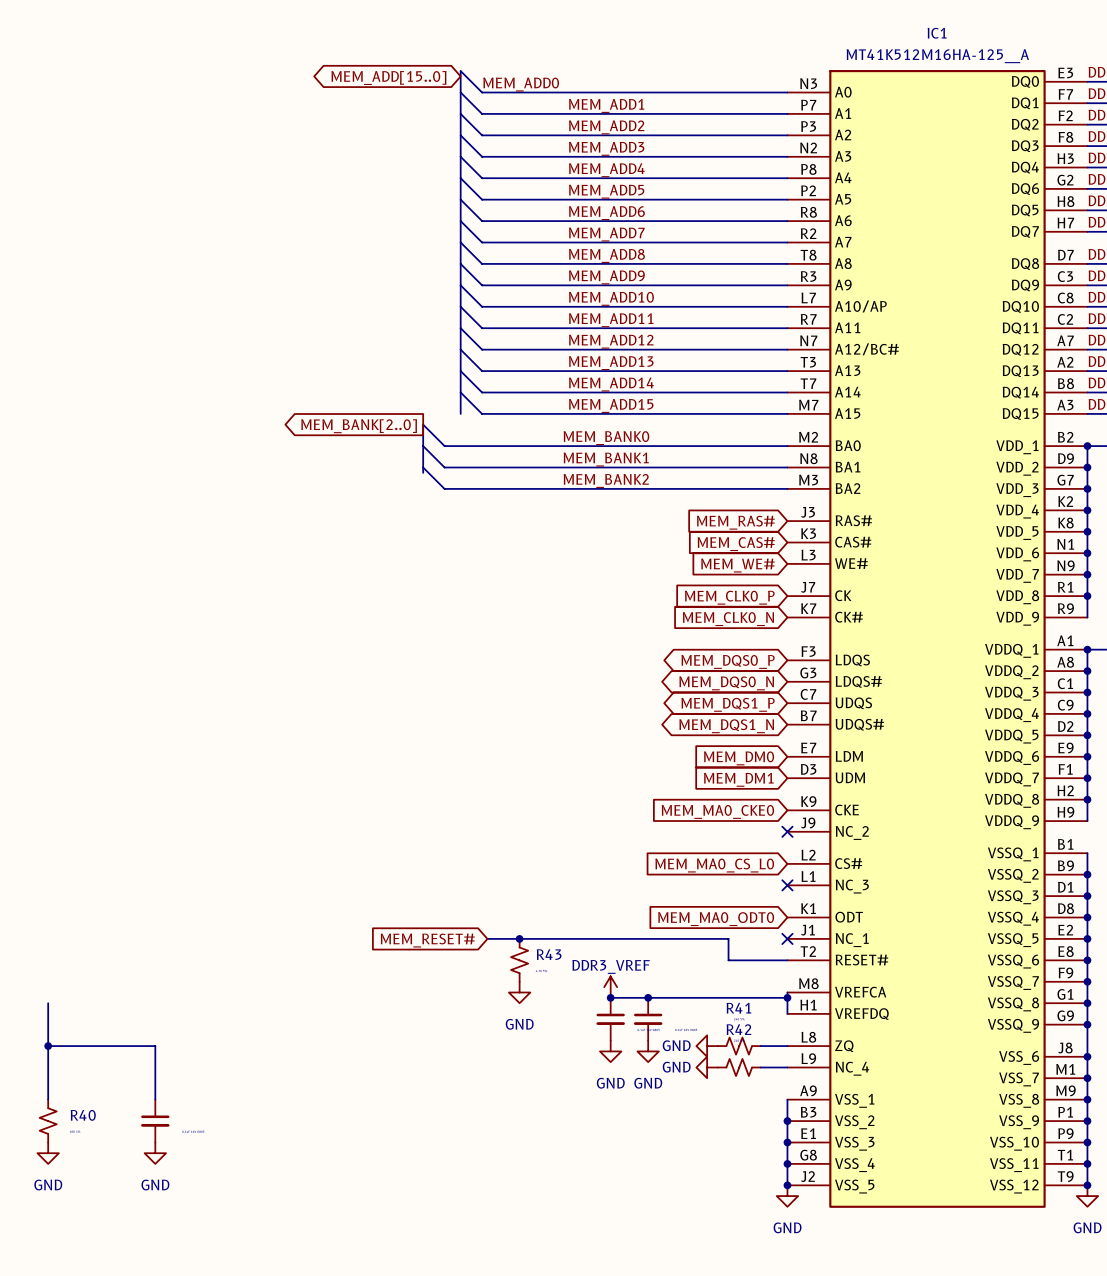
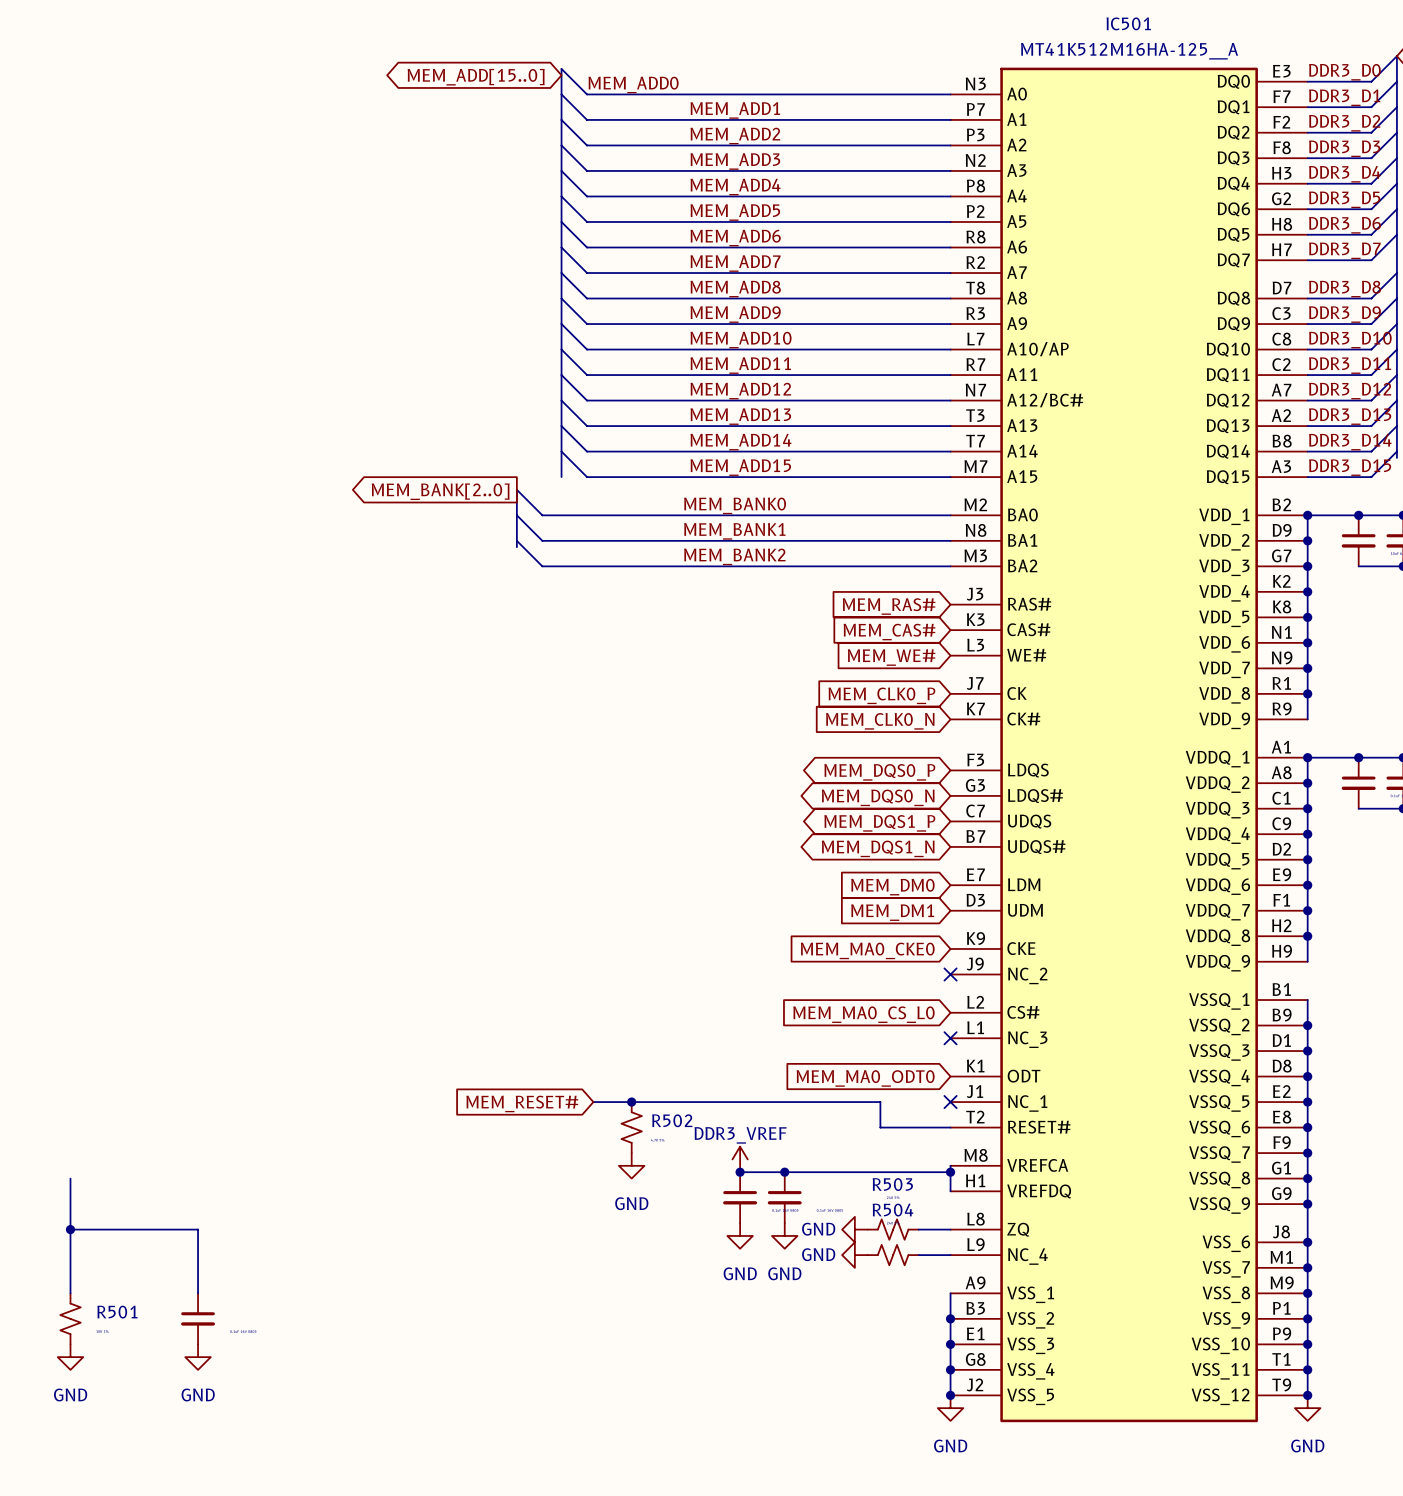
IC1 name: IC1 (937, 33) -> IC501 (1128, 23)
R43 name: R43 (549, 954) -> R502 (672, 1120)
R41 name: R41 (738, 1008) -> R503 (892, 1184)
R42 name: R42 (738, 1029) -> R504 (892, 1210)
R40 name: R40 (83, 1115) -> R501 (117, 1312)

